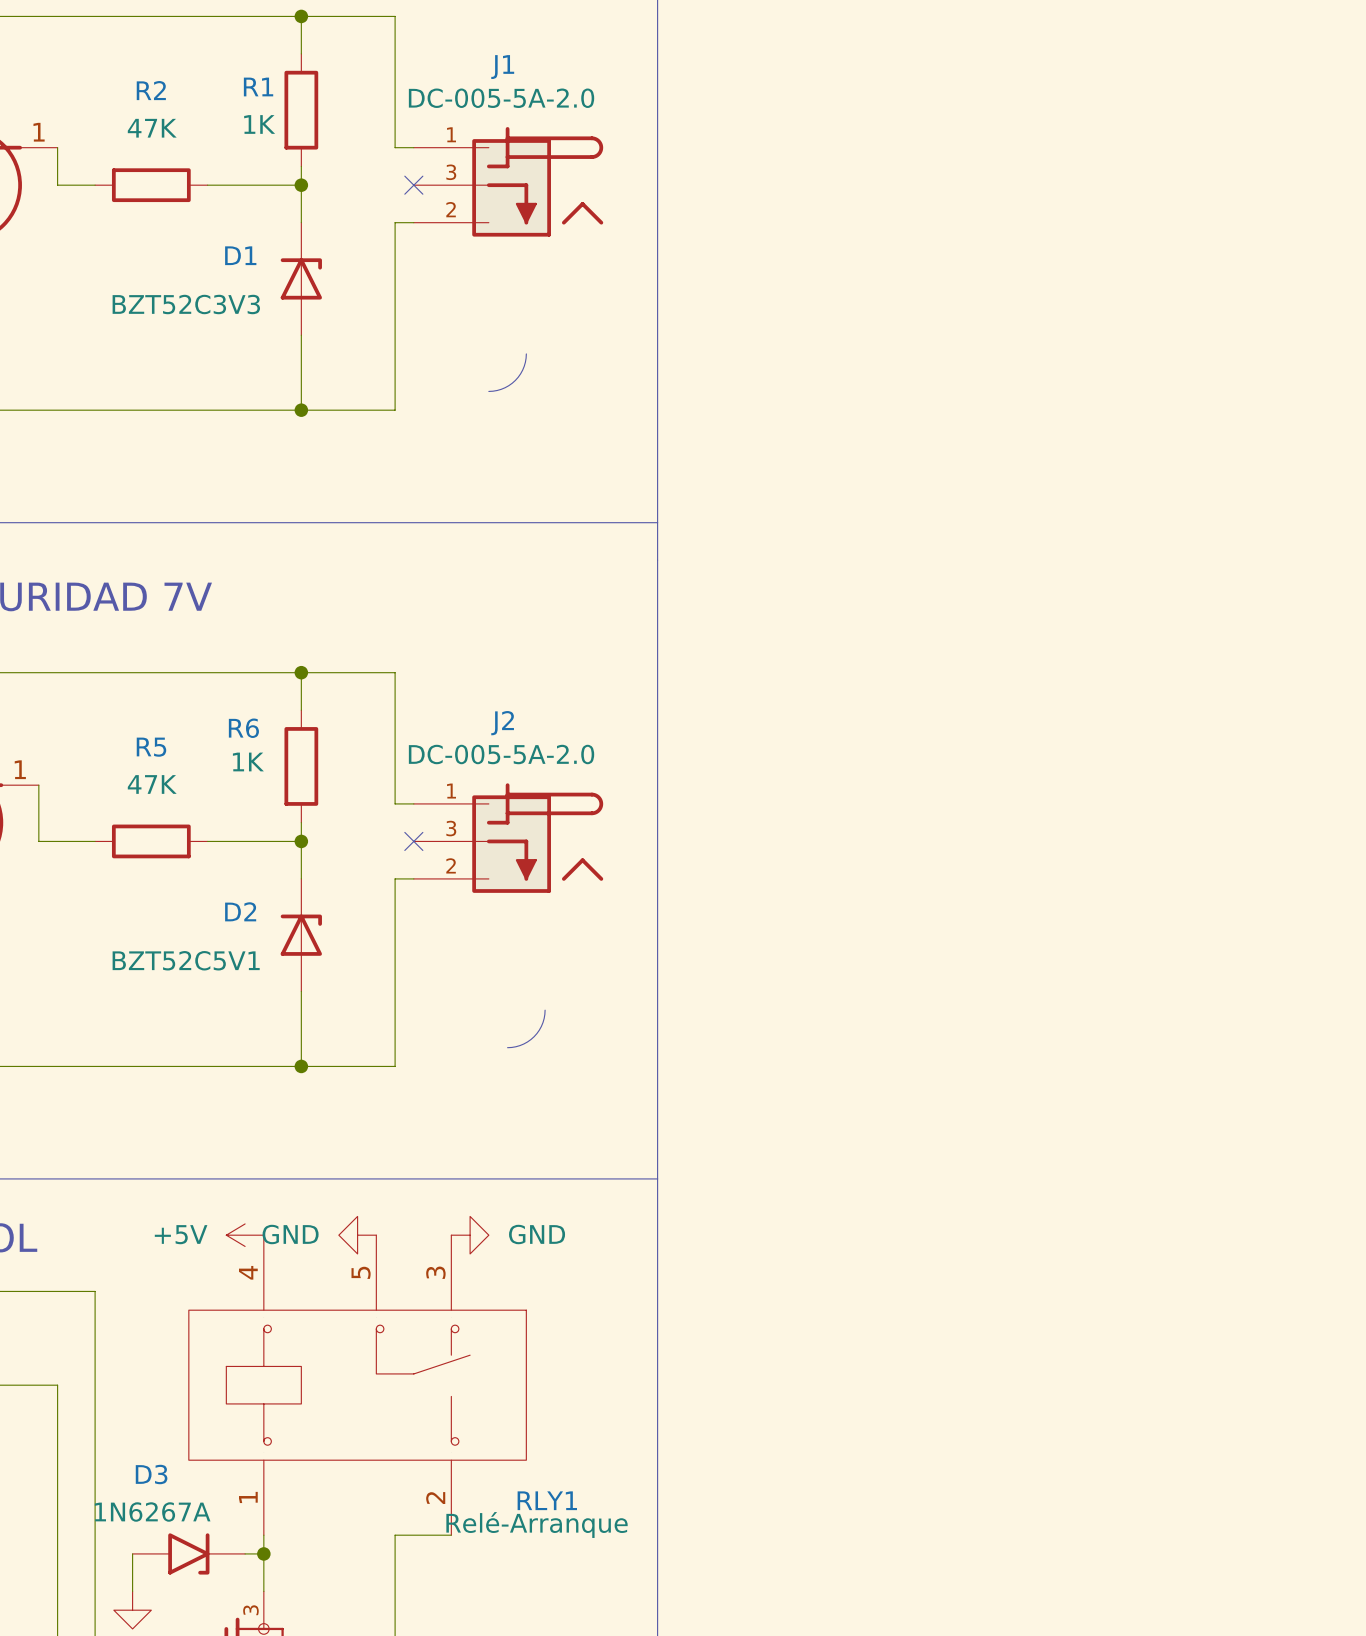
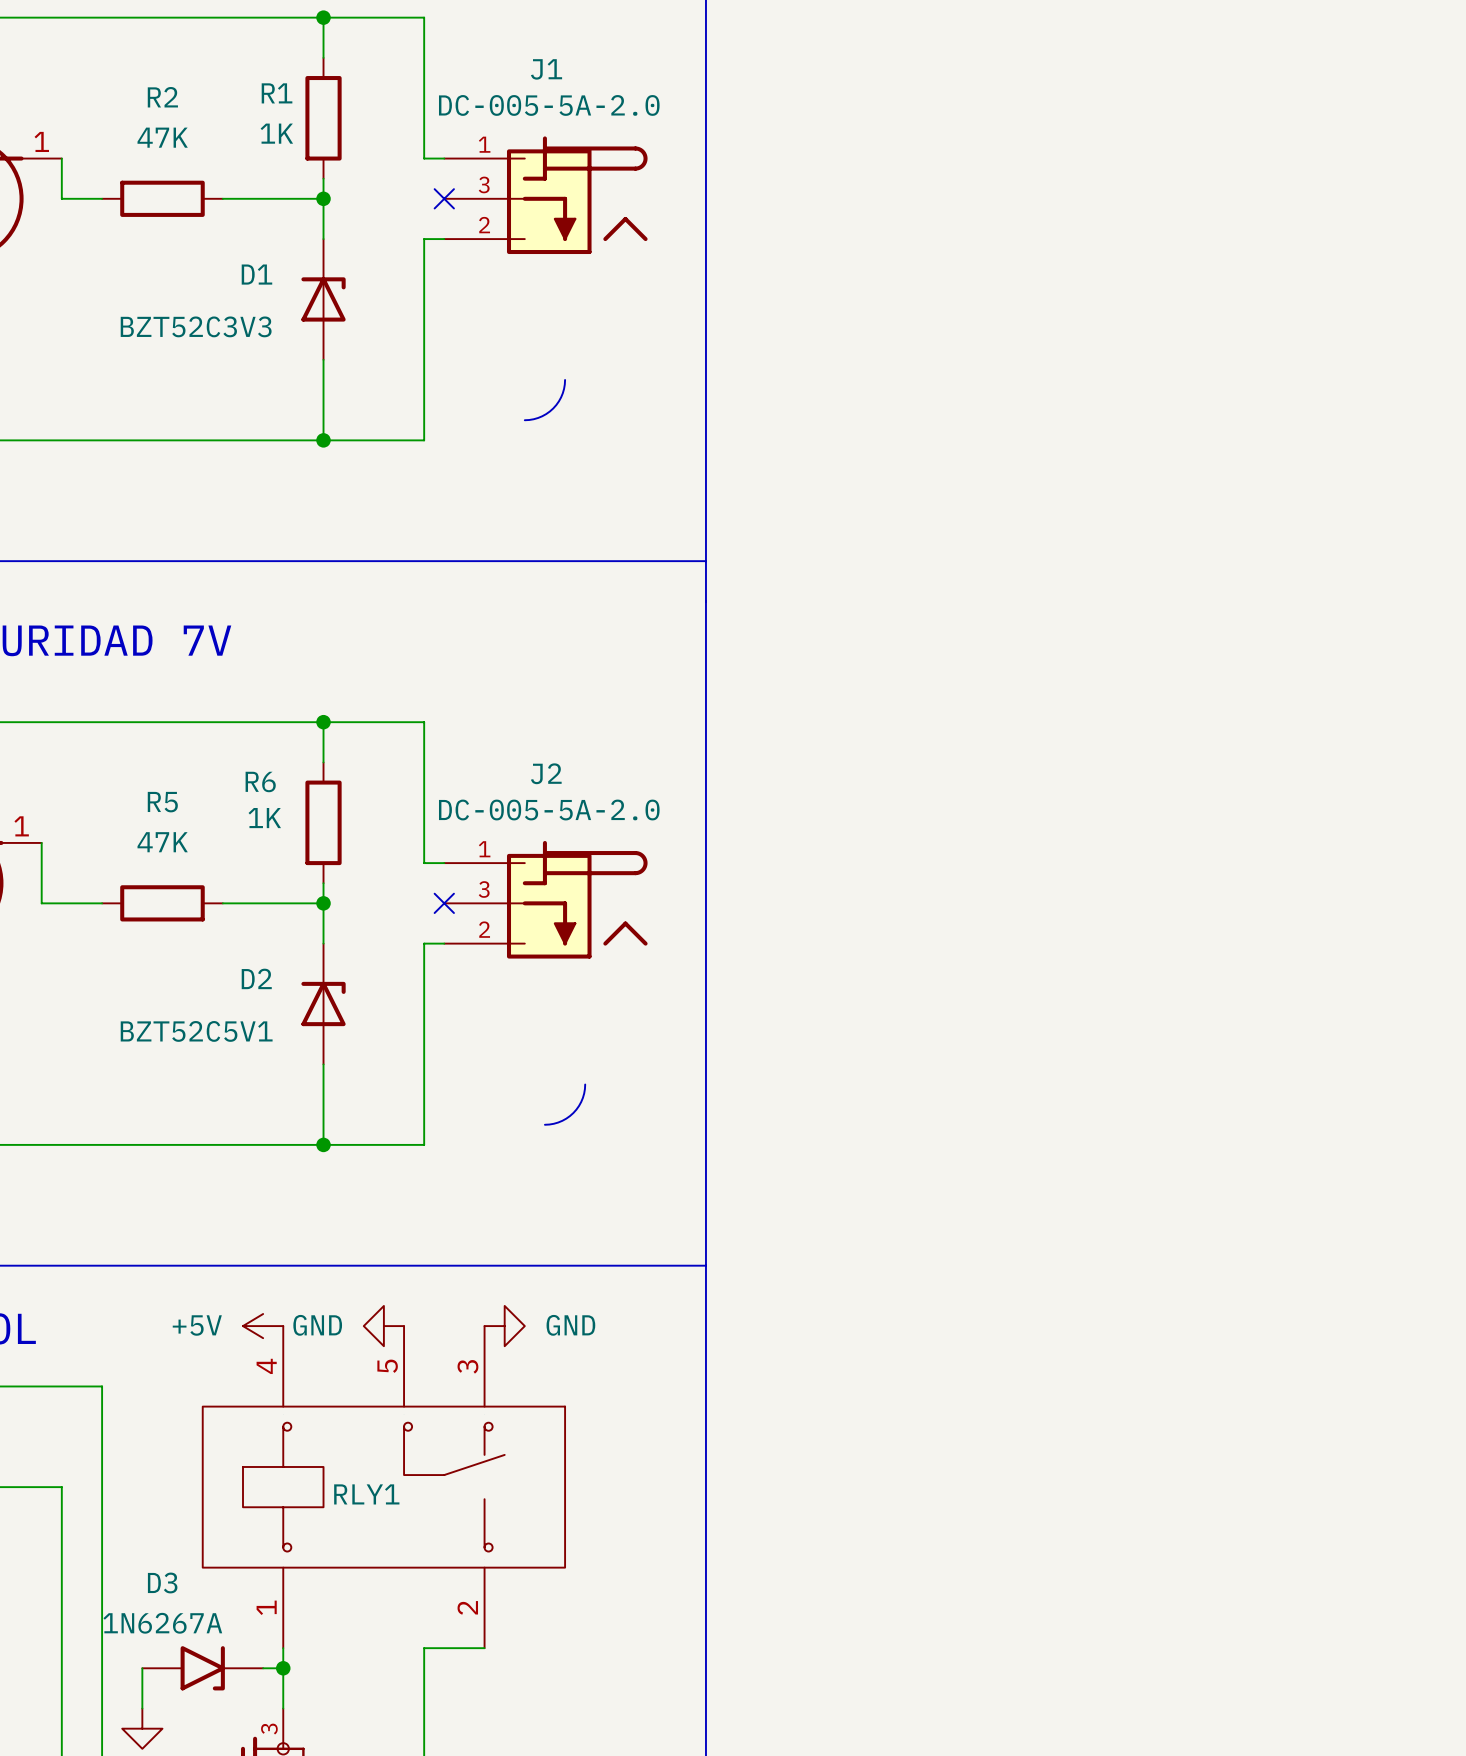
RLY1 name position: RLY1 (547, 1500) -> RLY1 (366, 1494)
RLY1 value: Relé-Arranque (537, 1525) -> none

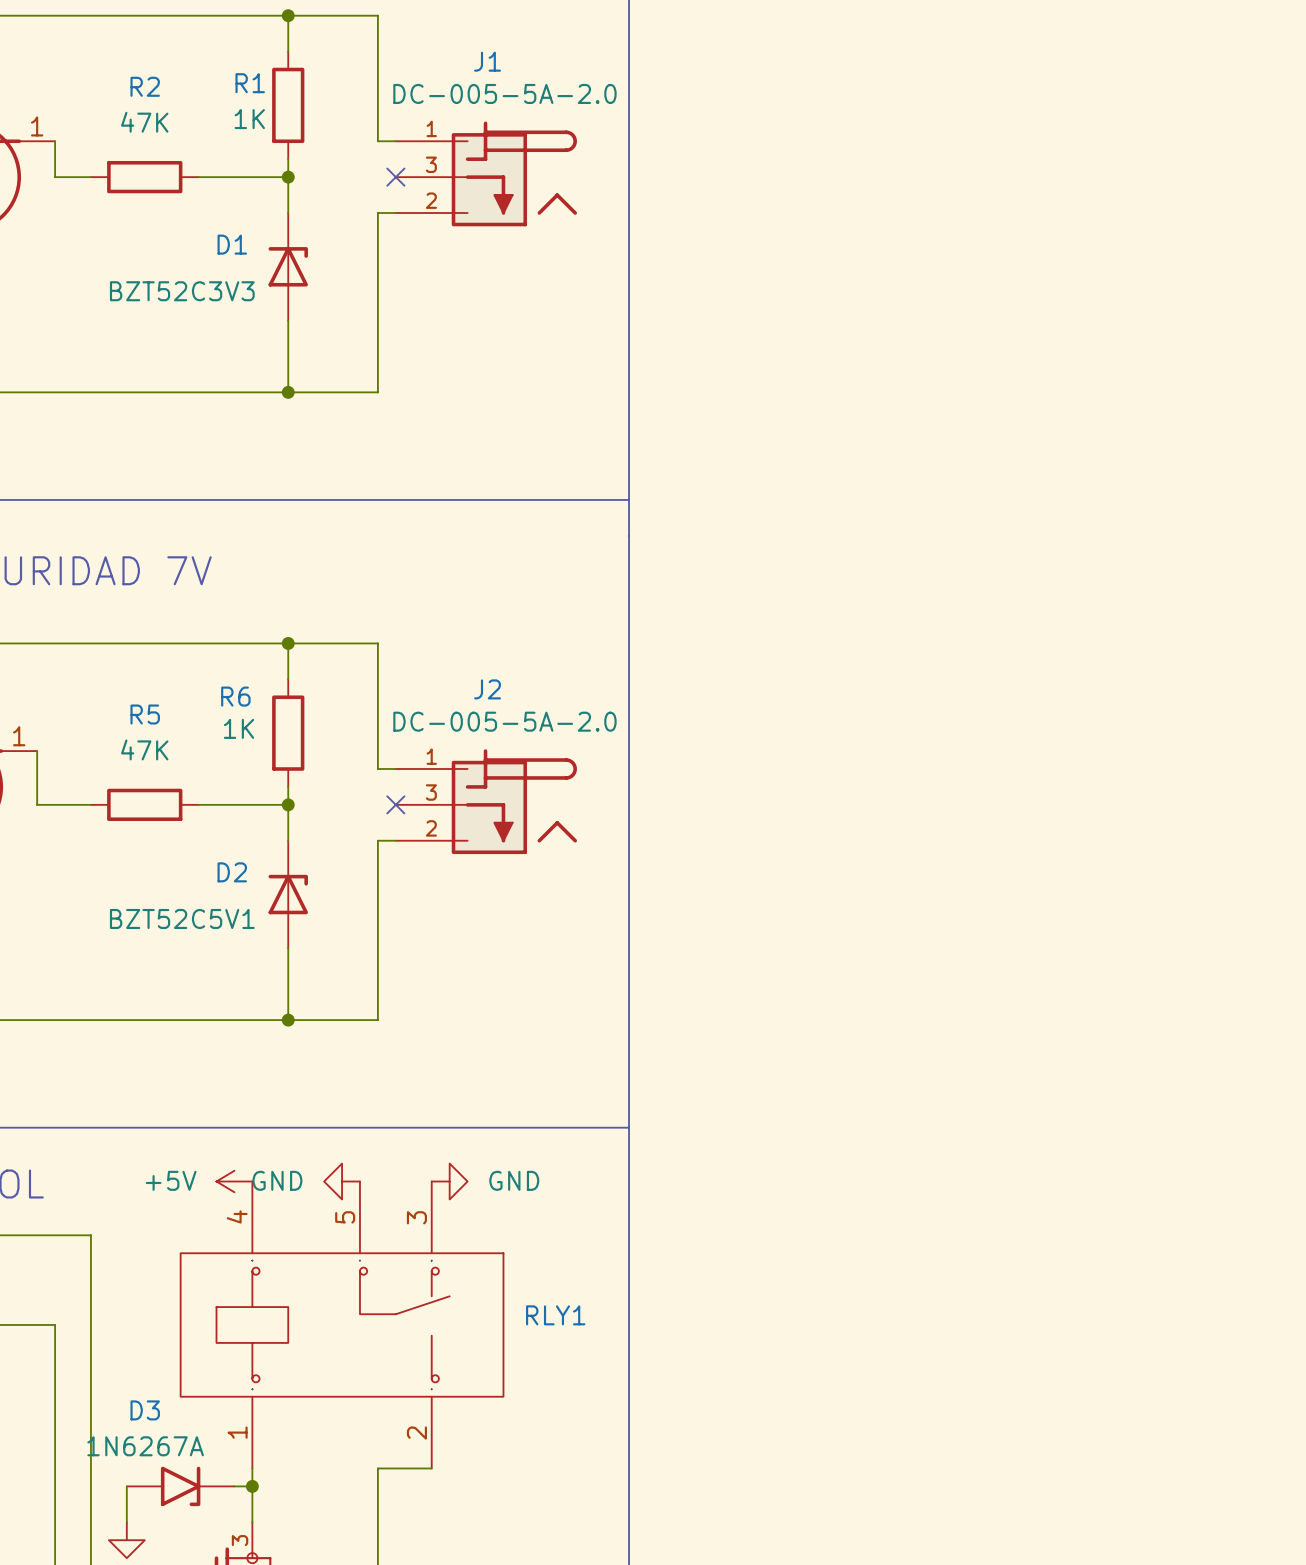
line: (565, 379) (561, 397) (553, 408) (542, 416) (524, 420) -> none
line: (585, 1084) (582, 1097) (573, 1112) (558, 1122) (544, 1124) -> none
RLY1 name position: RLY1 (366, 1494) -> RLY1 (555, 1315)

